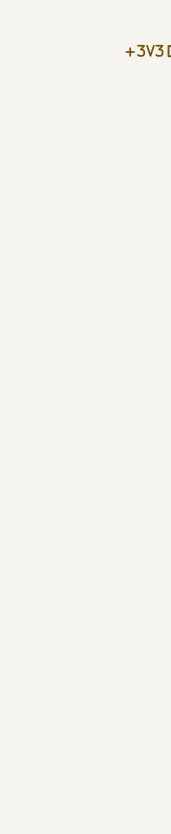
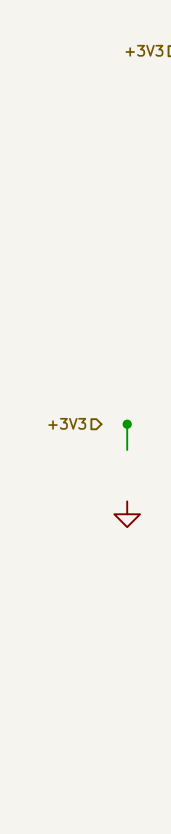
hierarchical label: none -> +3V3 (67, 423)
wire: none -> (127, 424) (127, 449)
junction: none -> (127, 424)
power symbol: none -> (127, 514)

